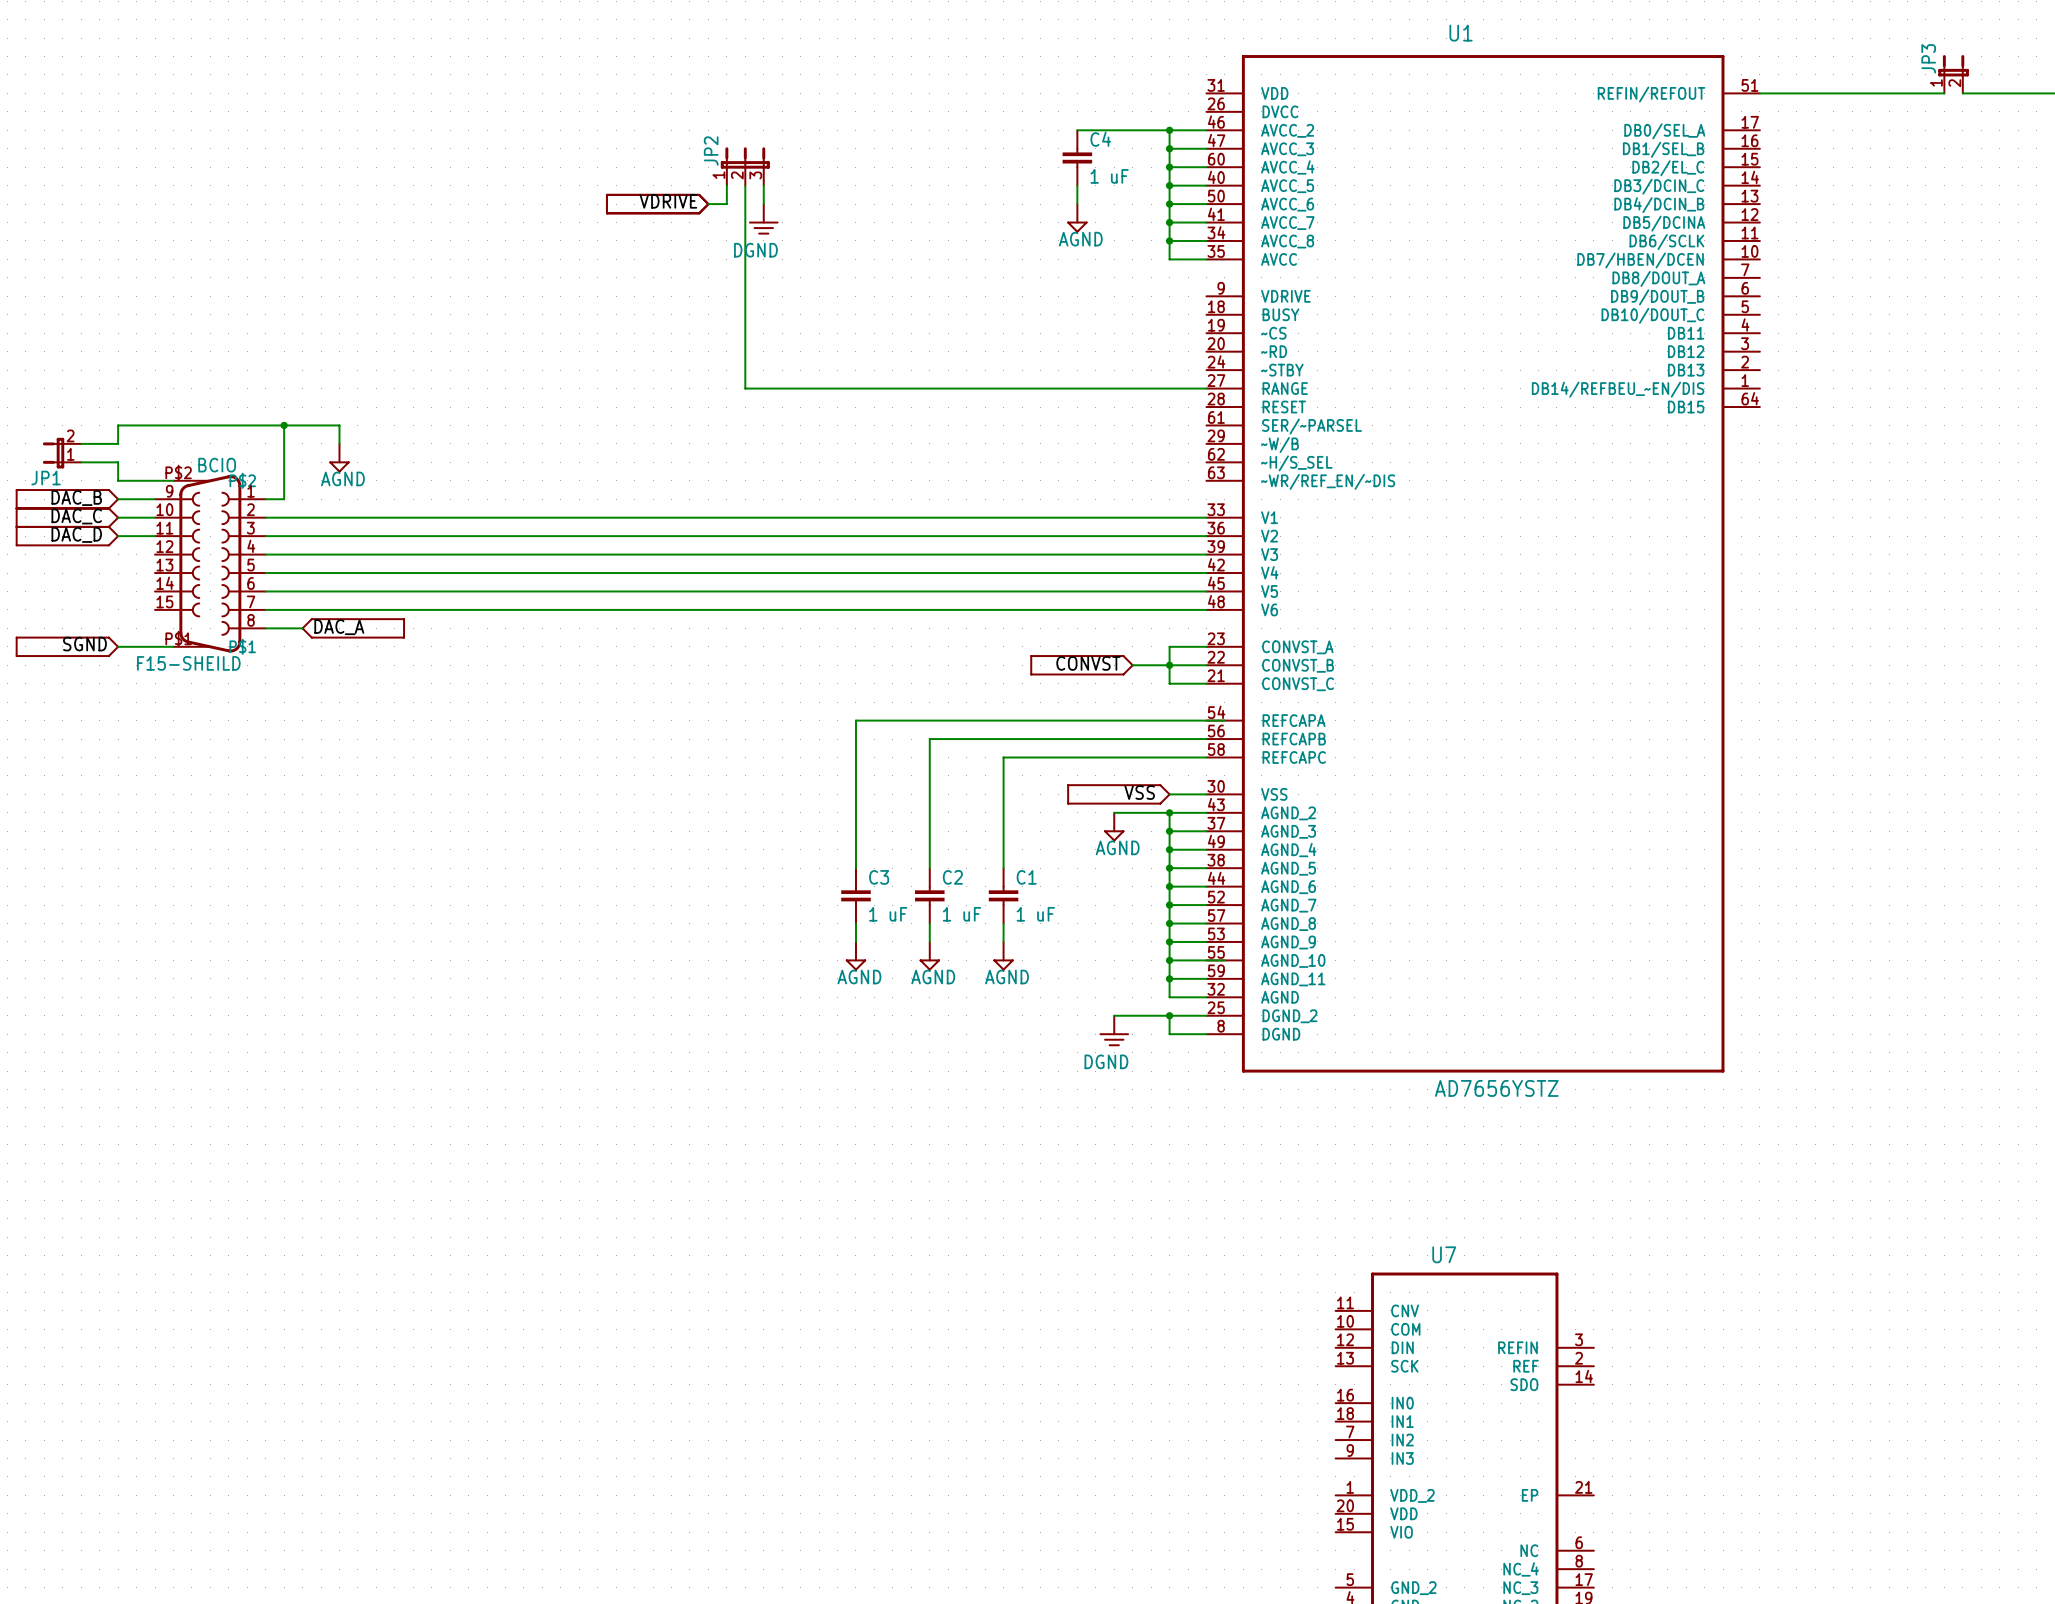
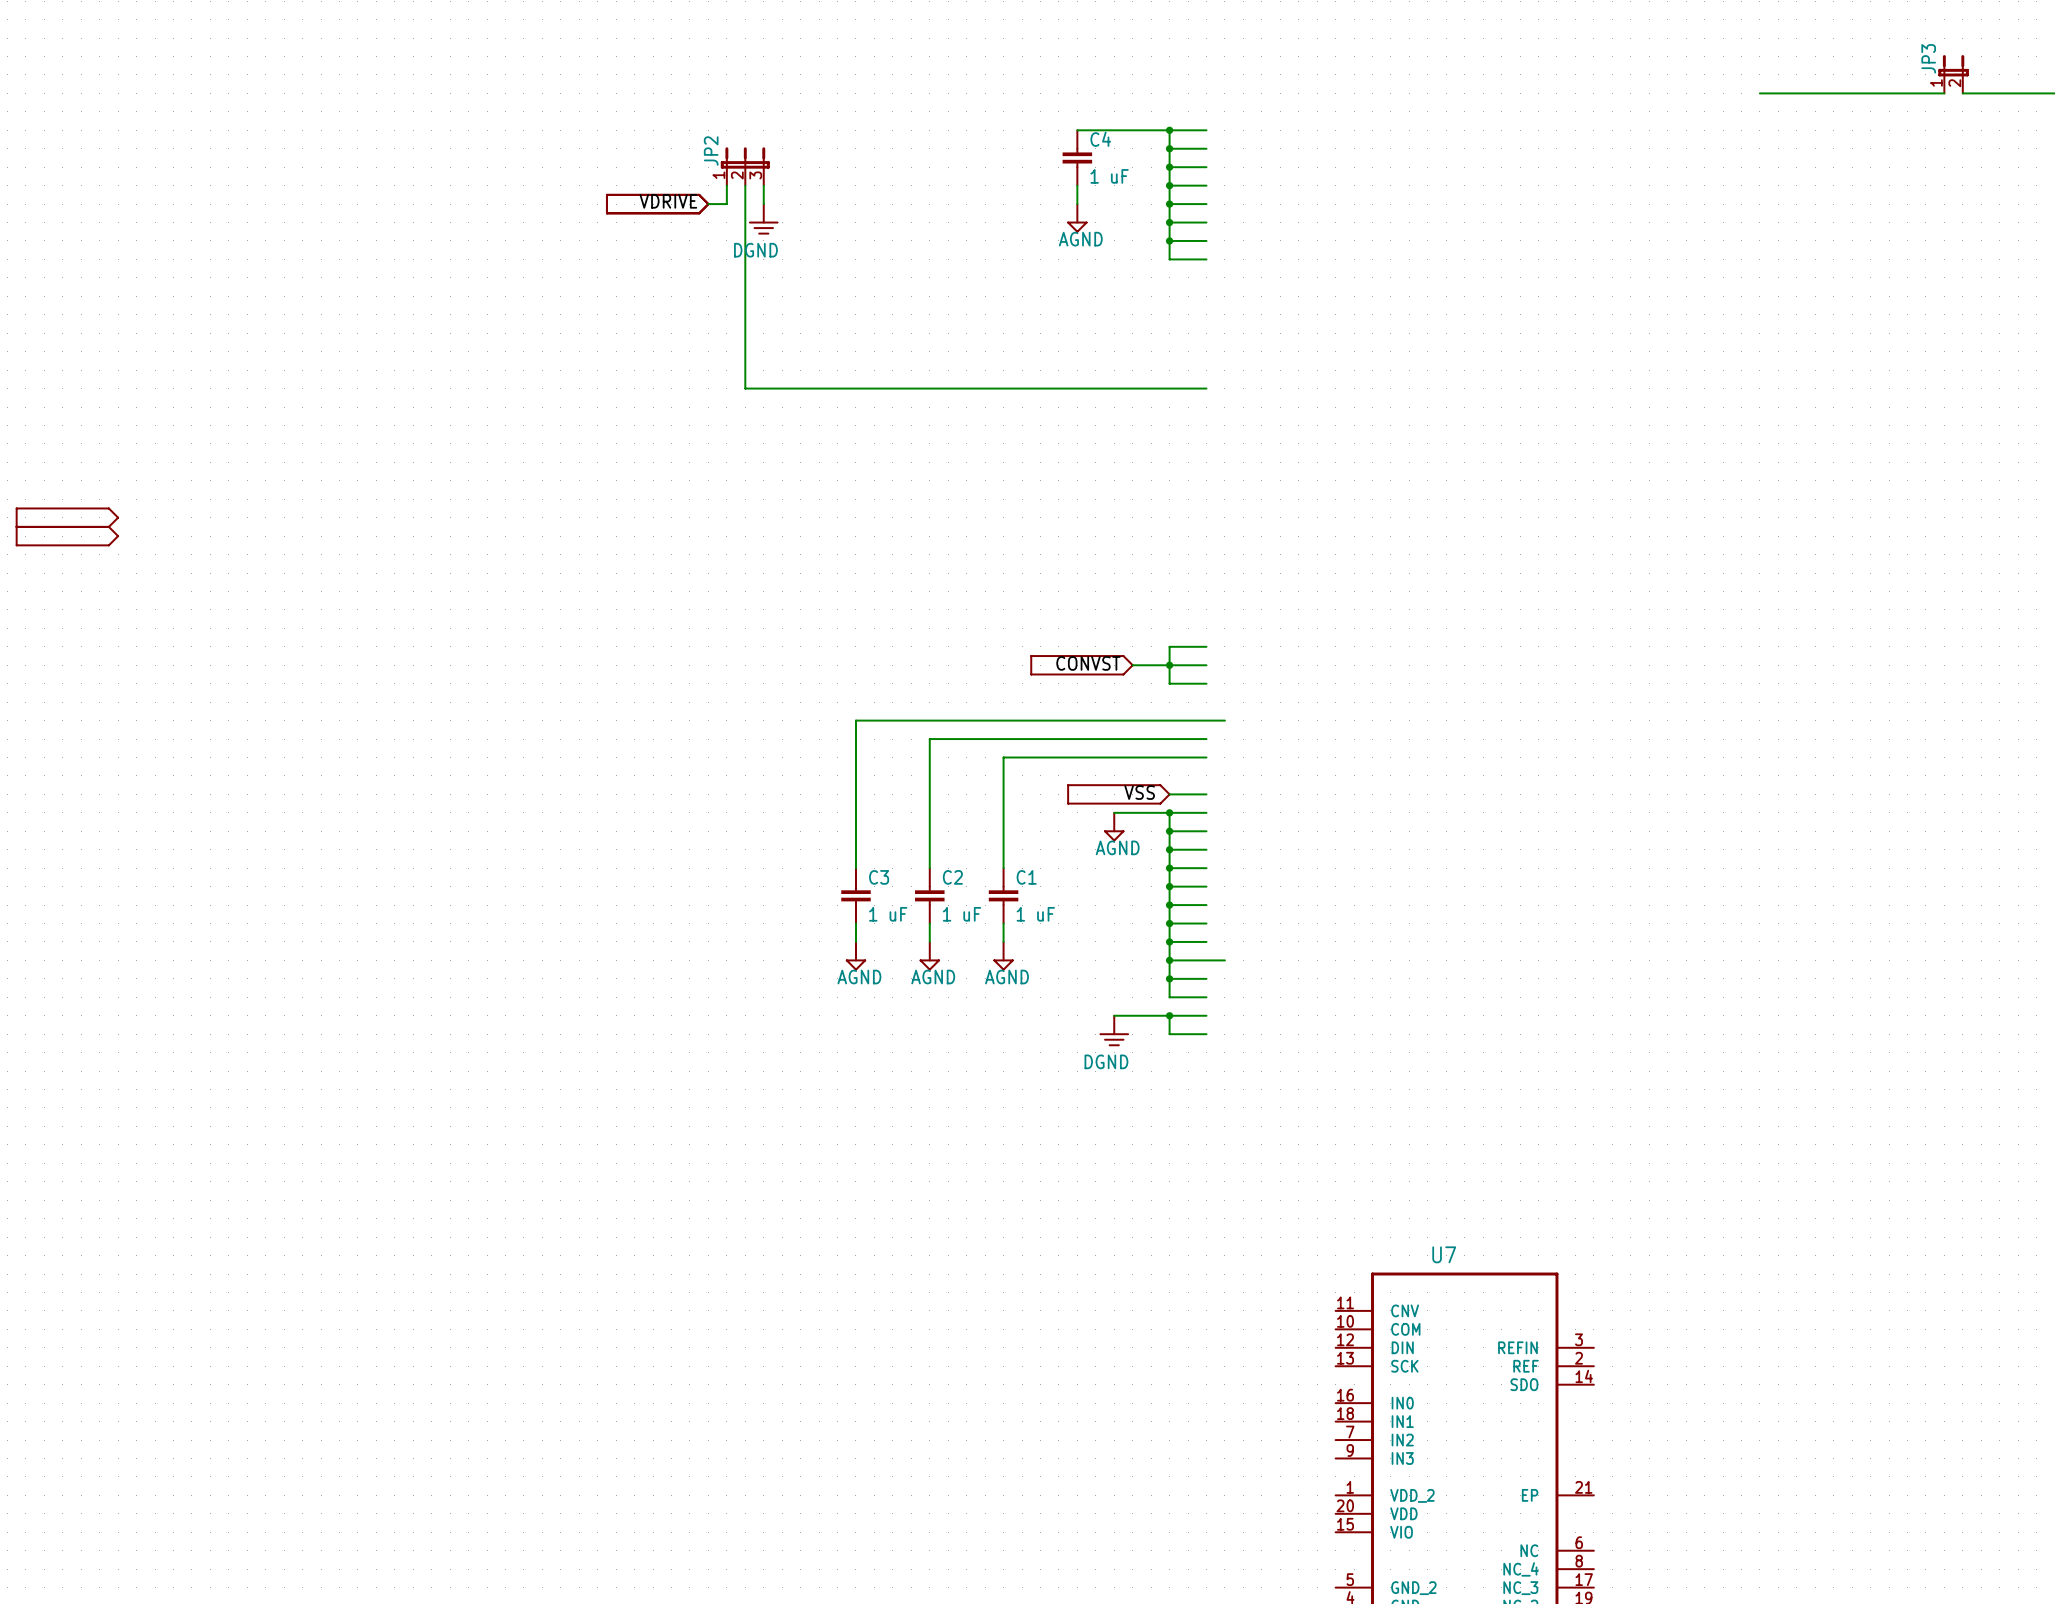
wire: (284, 425) (284, 499) (265, 499) -> none
junction: (284, 425) -> none
wire: (81, 443) (118, 443) (118, 425) (339, 425) (339, 443) -> none
JP1: (62, 453) -> none
power symbol: AGND (339, 458) -> none
wire: (81, 462) (118, 462) (118, 480) (173, 480) -> none
label: DAC_B (76, 498) -> none
part: (67, 499) -> none
wire: (118, 499) (155, 499) -> none
label: DAC_C (76, 516) -> none
wire: (118, 517) (155, 517) -> none
wire: (265, 517) (1206, 517) -> none
label: DAC_D (76, 534) -> none
wire: (118, 536) (155, 536) -> none
wire: (265, 536) (1206, 536) -> none
wire: (265, 554) (1206, 554) -> none
BCIO: F15-SHEILD (210, 563) -> none
U1: AD7656YSTZ (1483, 563) -> none
wire: (265, 573) (1206, 573) -> none
wire: (265, 591) (1206, 591) -> none
wire: (265, 609) (1206, 609) -> none
label: DAC_A (339, 627) -> none
wire: (265, 628) (302, 628) -> none
part: (353, 628) -> none
label: SGND (84, 644) -> none
part: (67, 646) -> none
wire: (118, 646) (173, 646) -> none

